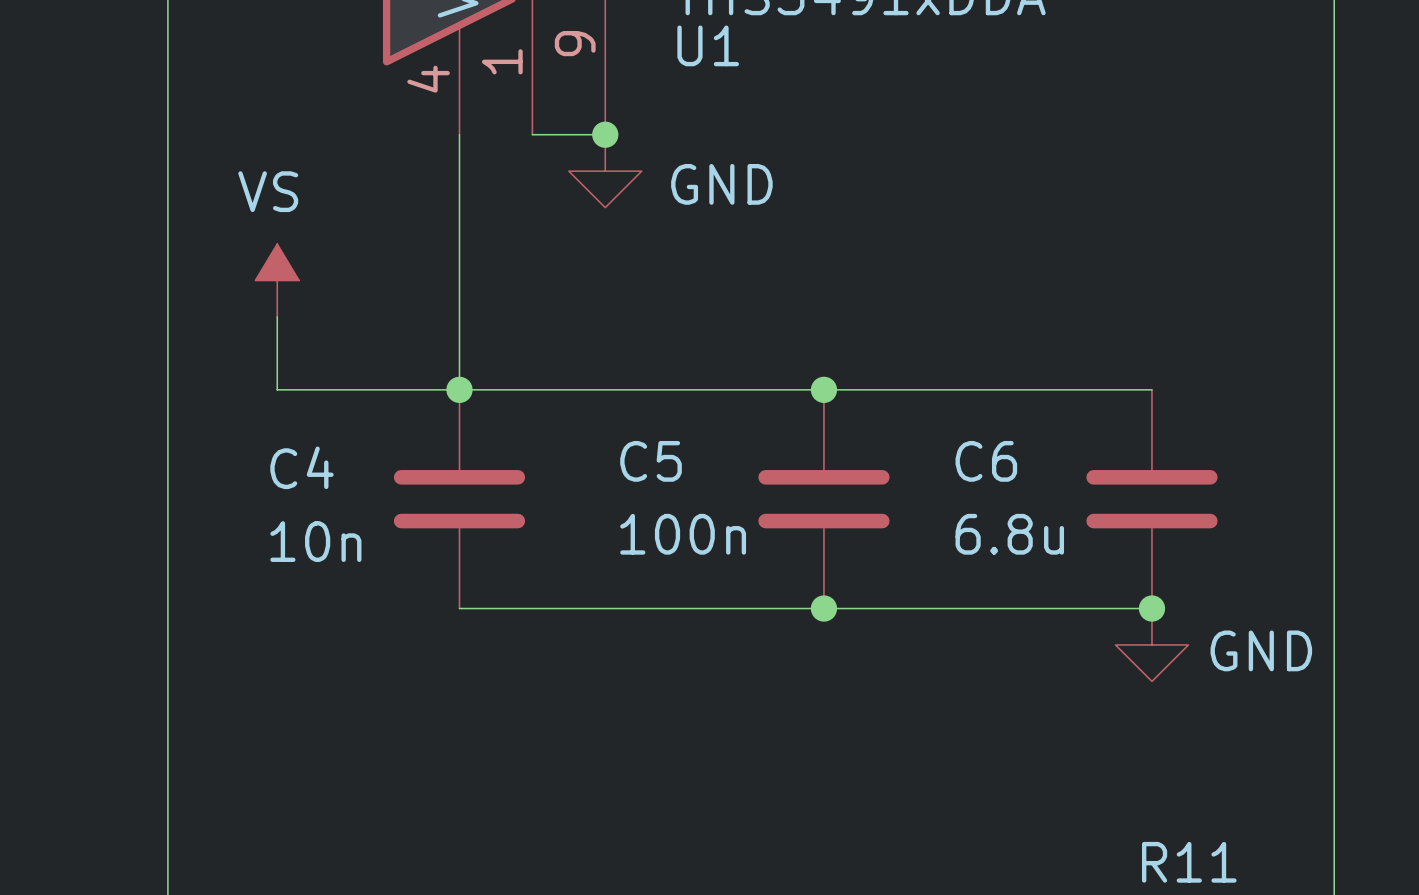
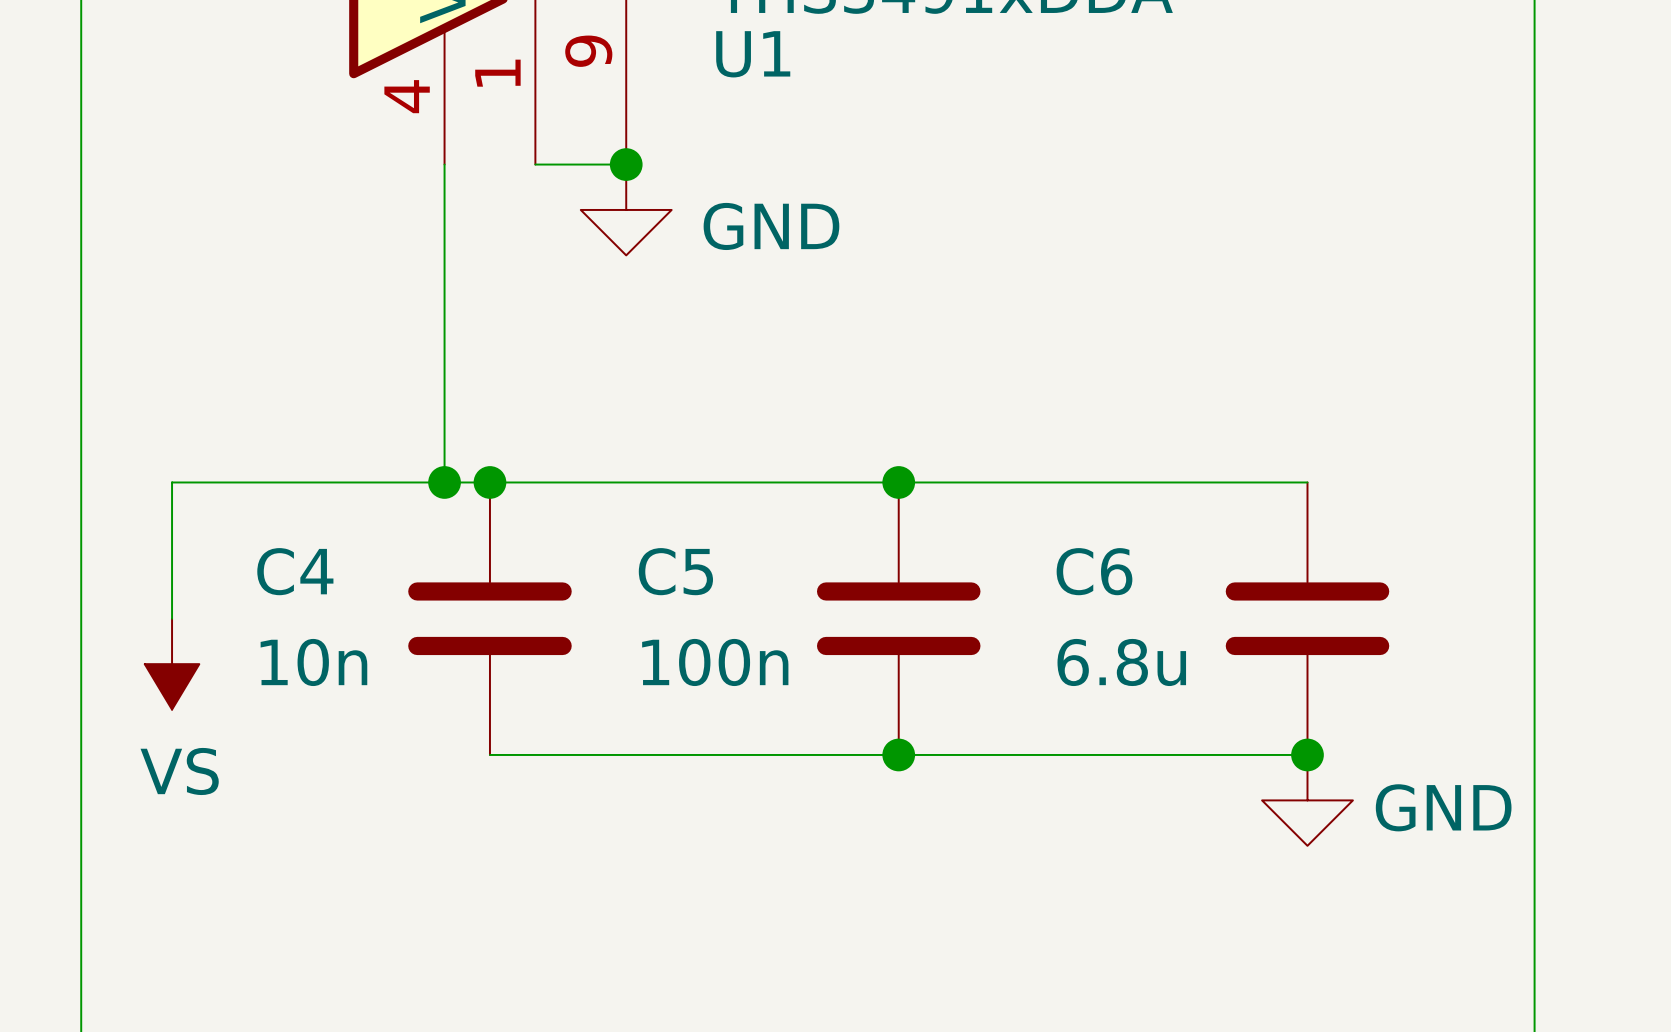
power symbol rotation: 0° (277, 280) -> 180° (172, 664)
power symbol position: VS (277, 280) -> VS (172, 664)
wire: (277, 316) (277, 389) -> (172, 618) (172, 482) (217, 482)
junction: none -> (489, 482)
C4 name position: C4 (302, 467) -> C4 (295, 571)
C4 position: (459, 499) -> (489, 618)
C4 value position: 10n (315, 541) -> 10n (313, 662)
wire: (459, 608) (495, 608) -> none

